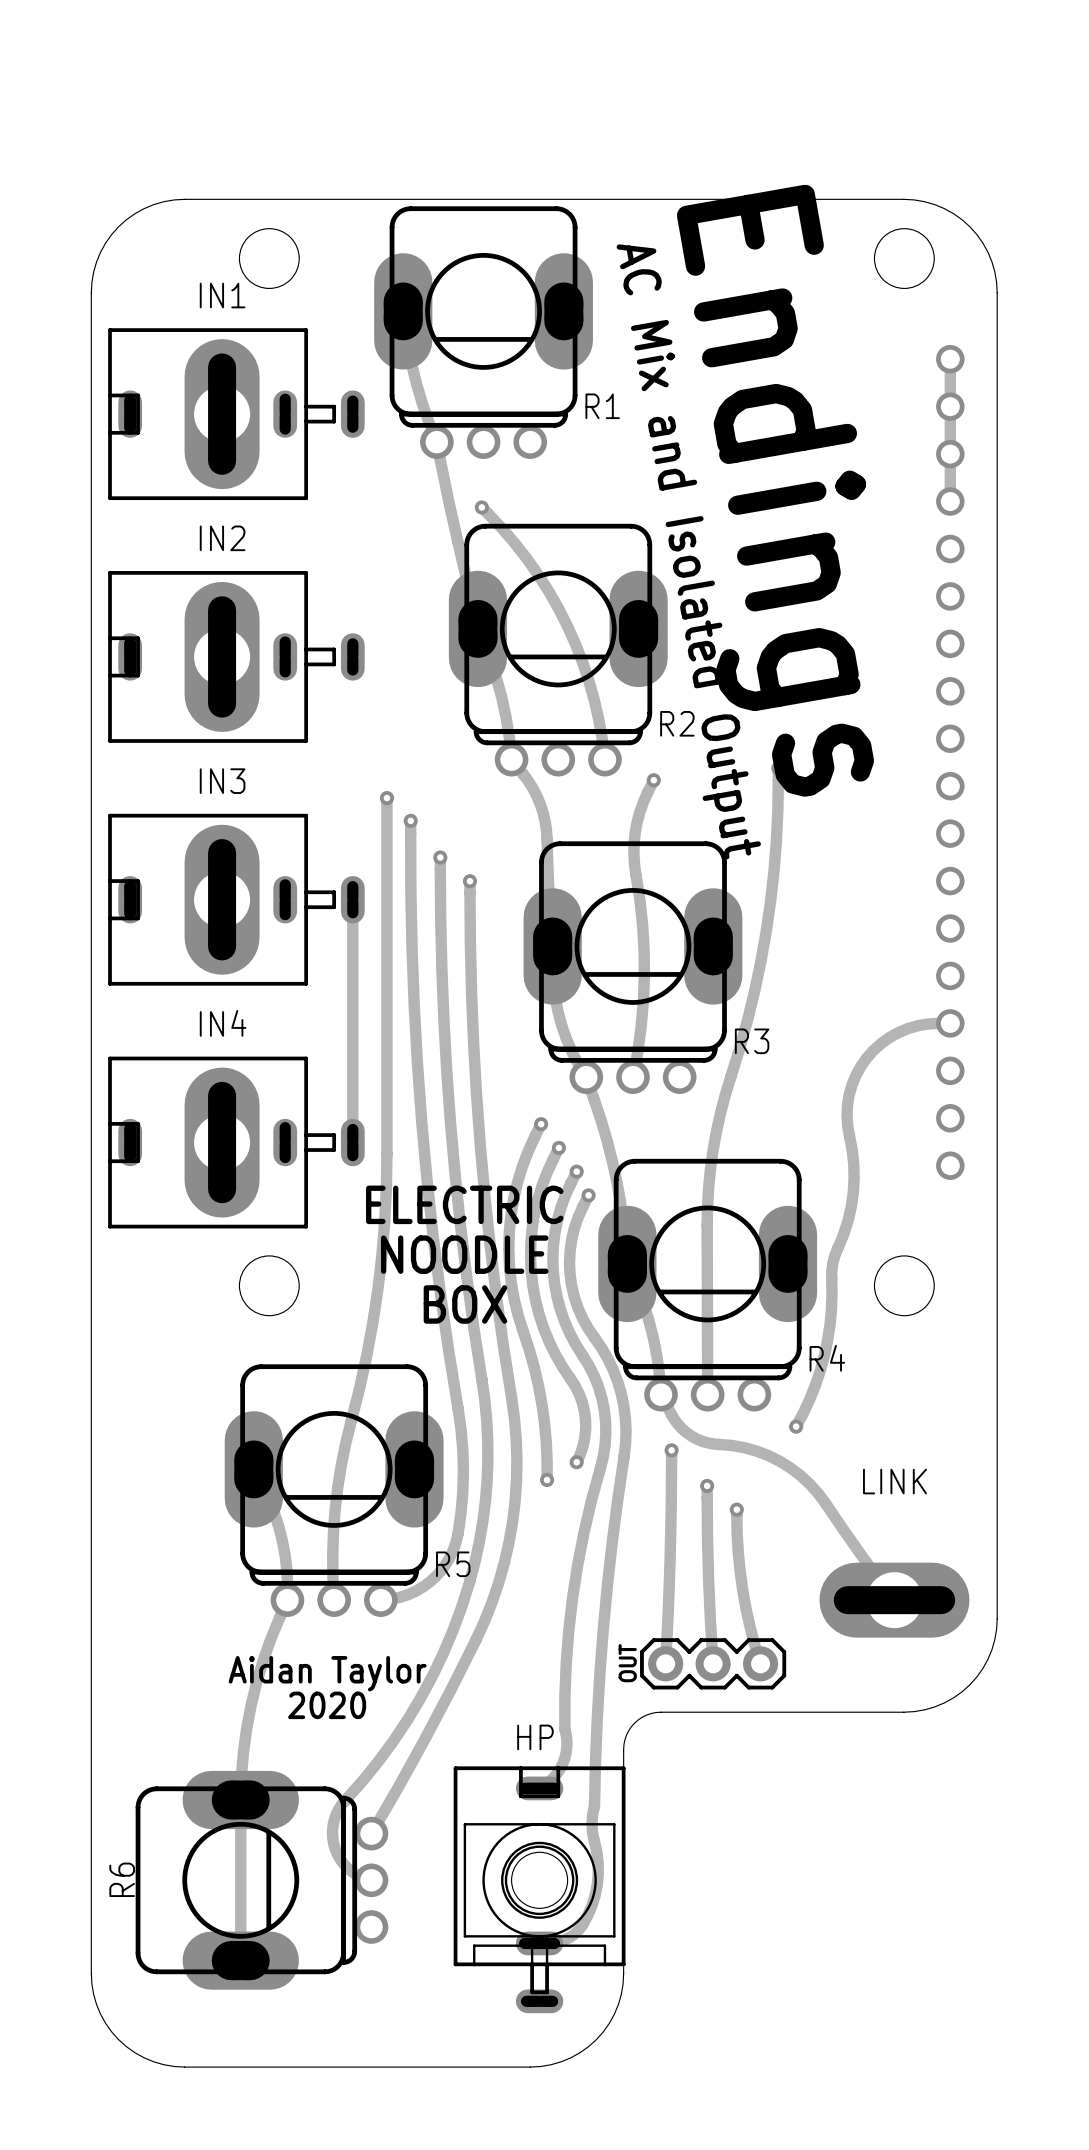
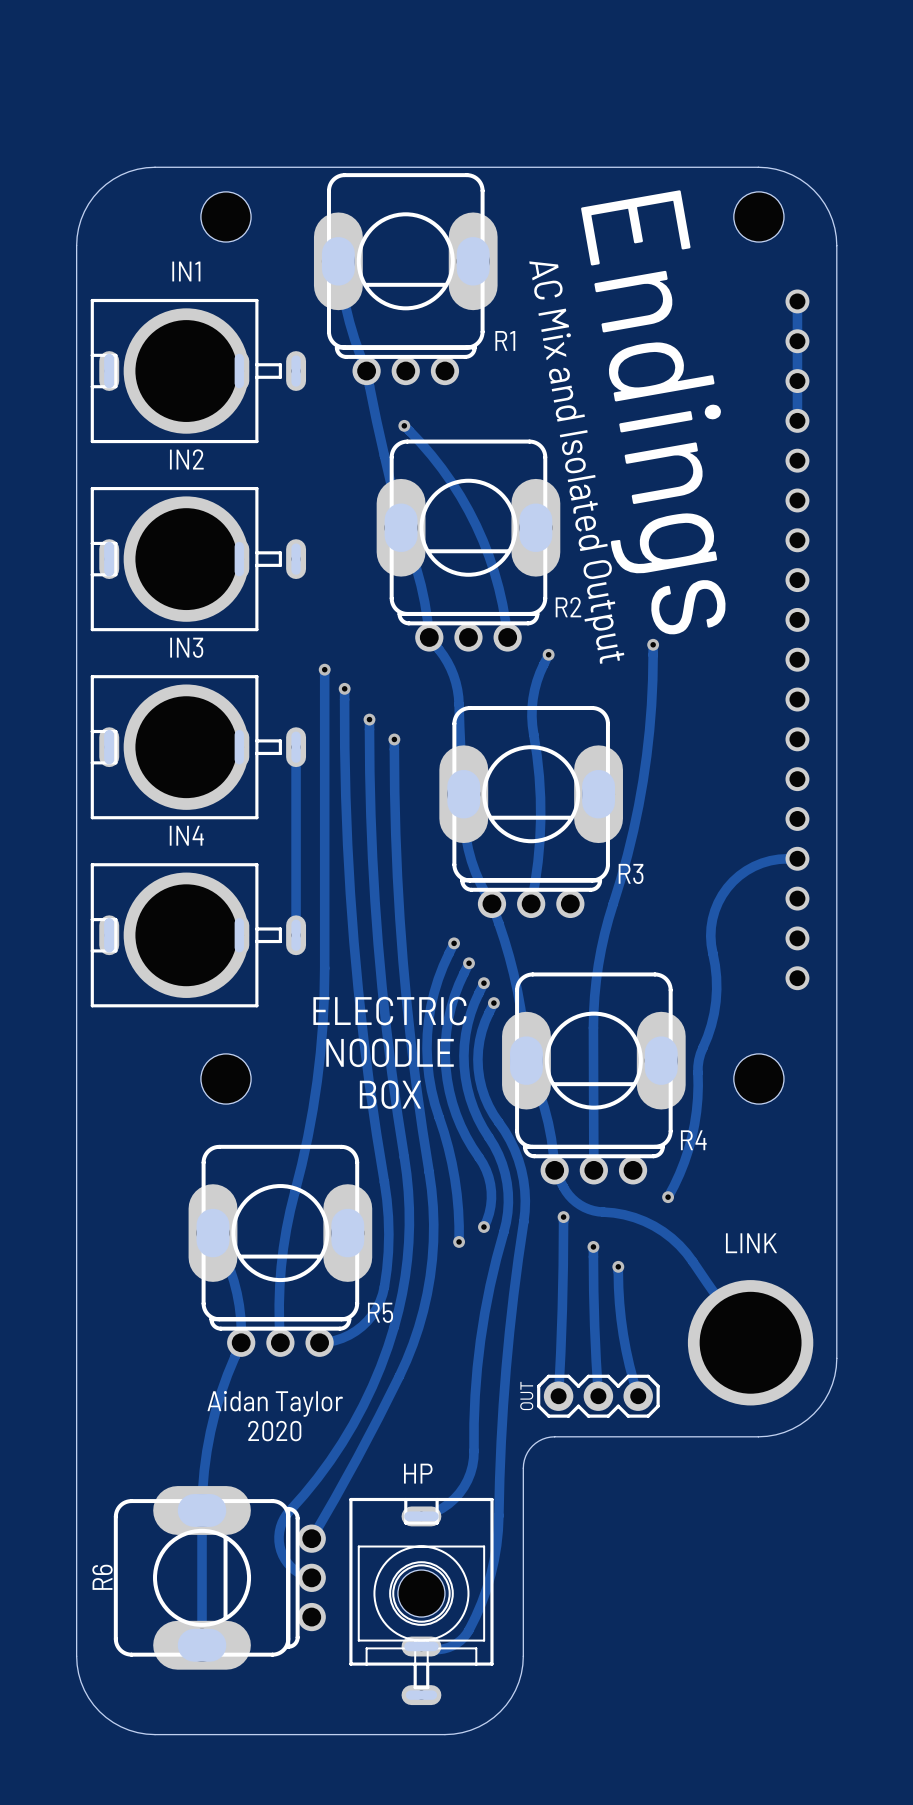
IN1 footprint: [108, 328, 365, 501] -> [90, 298, 307, 444]
IN2 footprint: [108, 571, 365, 743] -> [90, 487, 307, 632]
IN3 footprint: [108, 813, 365, 986] -> [90, 675, 307, 820]
IN4 footprint: [108, 1056, 365, 1229] -> [90, 863, 307, 1008]
LINK footprint: [819, 1562, 970, 1638] -> [687, 1280, 814, 1406]
track: (564, 1729) (566, 1746) (562, 1763) (553, 1777) (539, 1788) -> (474, 1450) (470, 1473) (459, 1493) (442, 1508) (421, 1516)
track: (594, 1806) (592, 1829) (598, 1873) (592, 1905) (582, 1924) (573, 1934) (561, 1940) (539, 1943) -> (498, 1515) (496, 1545) (490, 1574) (481, 1603) (469, 1630) (460, 1640) (448, 1647) (434, 1649) (421, 1646)
HP position: (539, 1889) -> (421, 1601)

